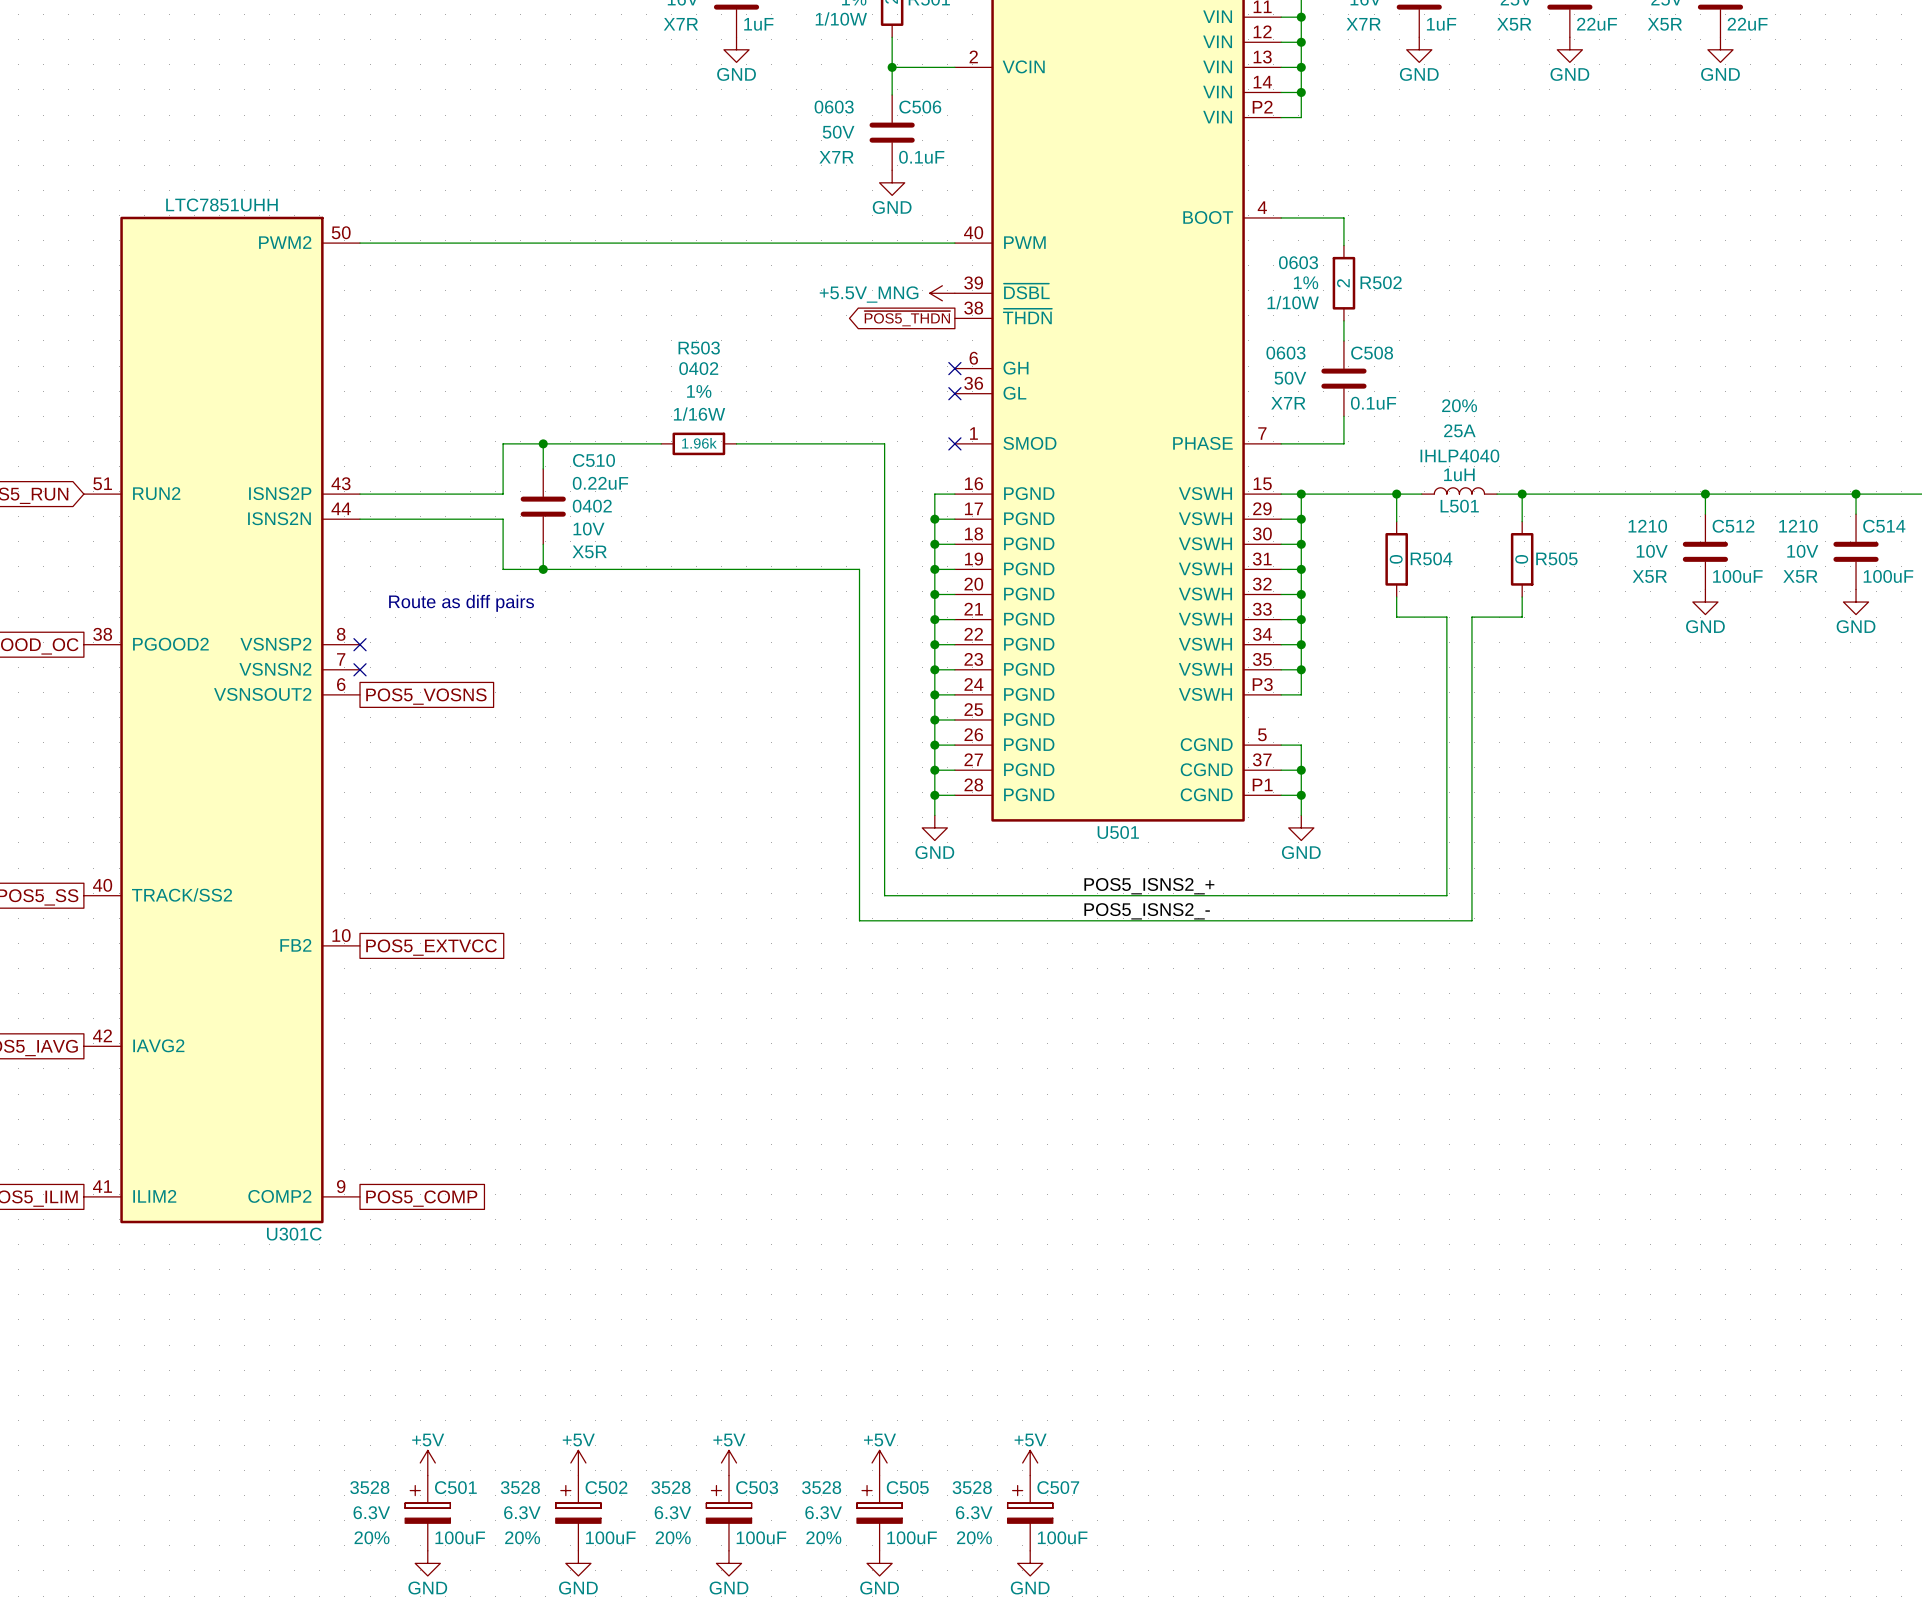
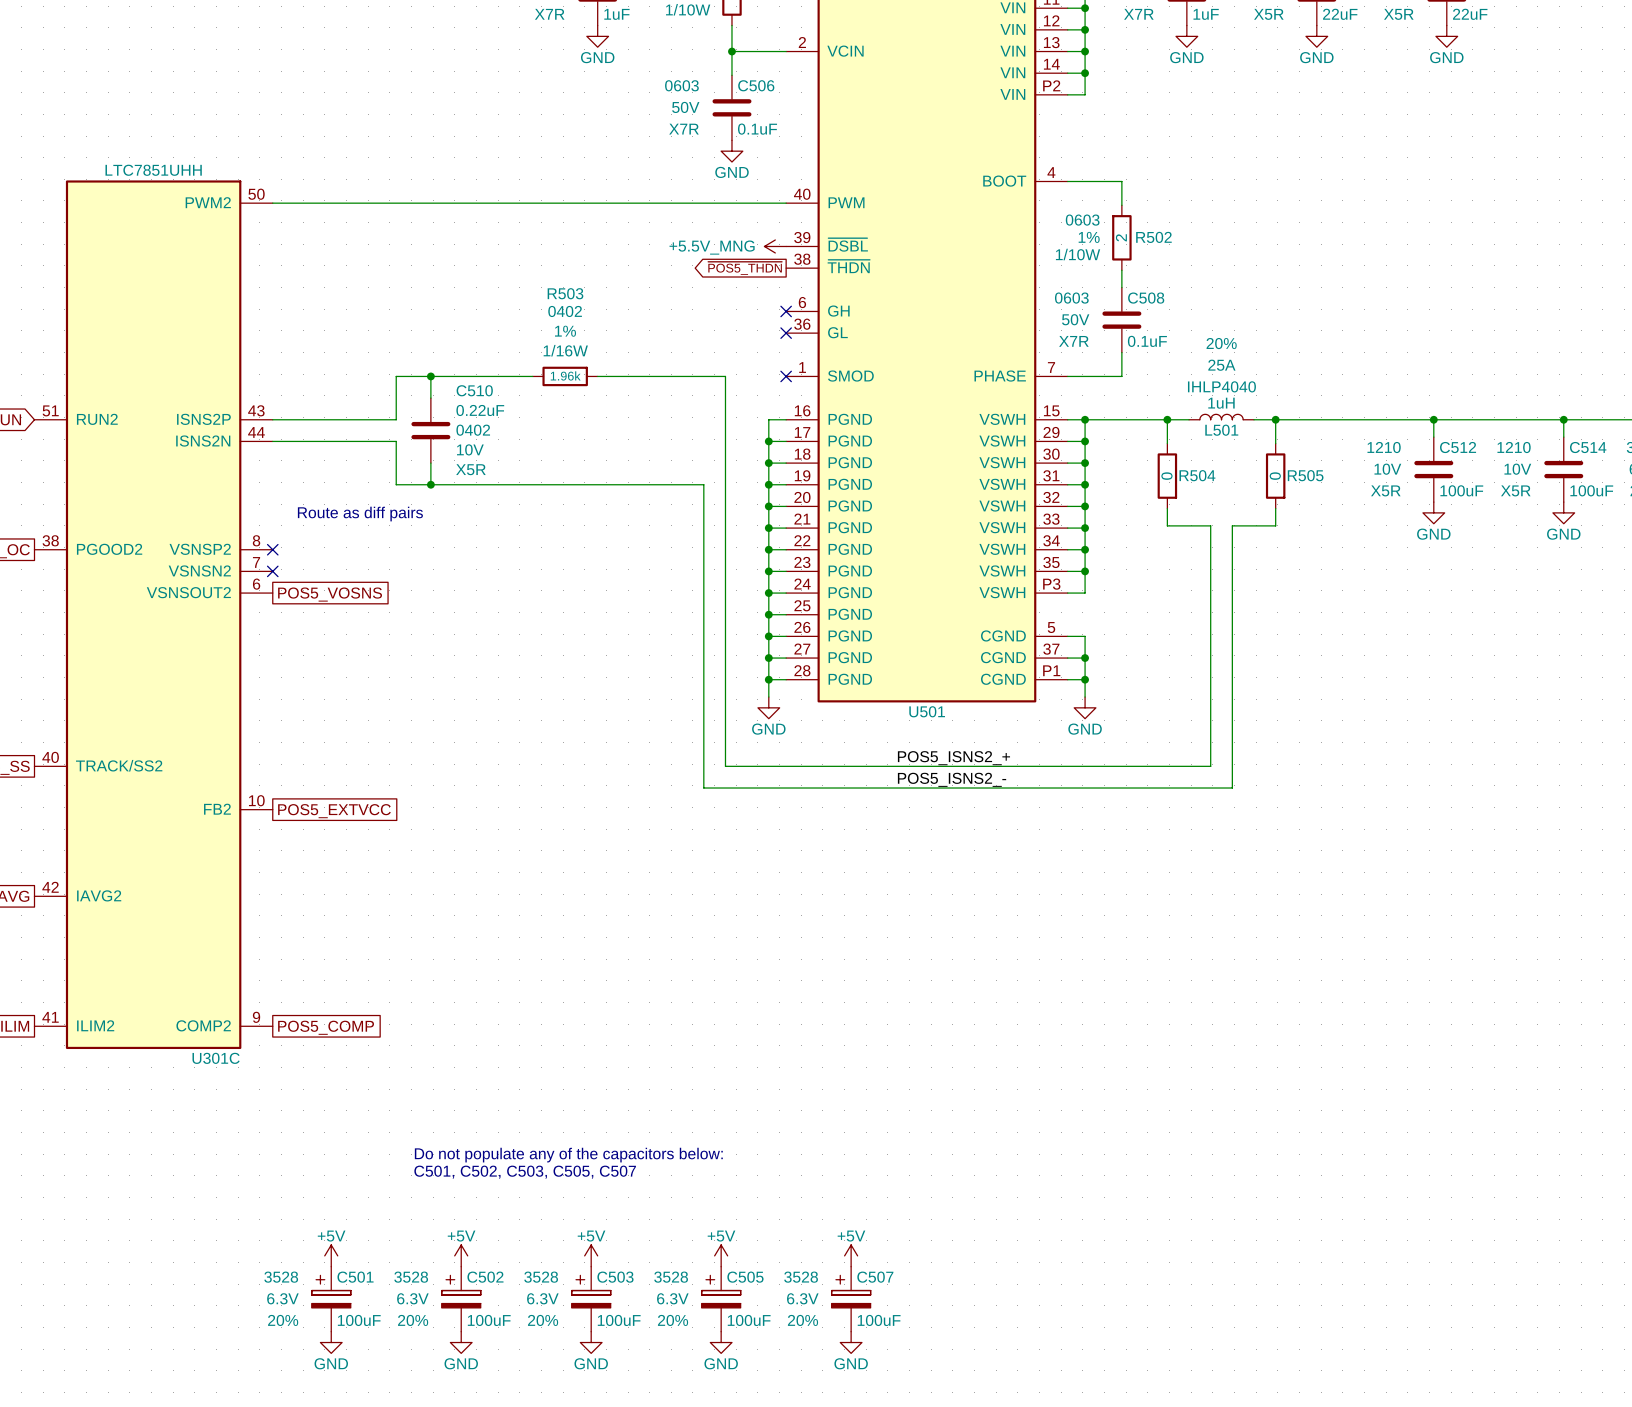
text: none -> Do not populate any of the capacitors below: (568, 1155)
text: none -> C501, C502, C503, C505, C507 (525, 1172)

